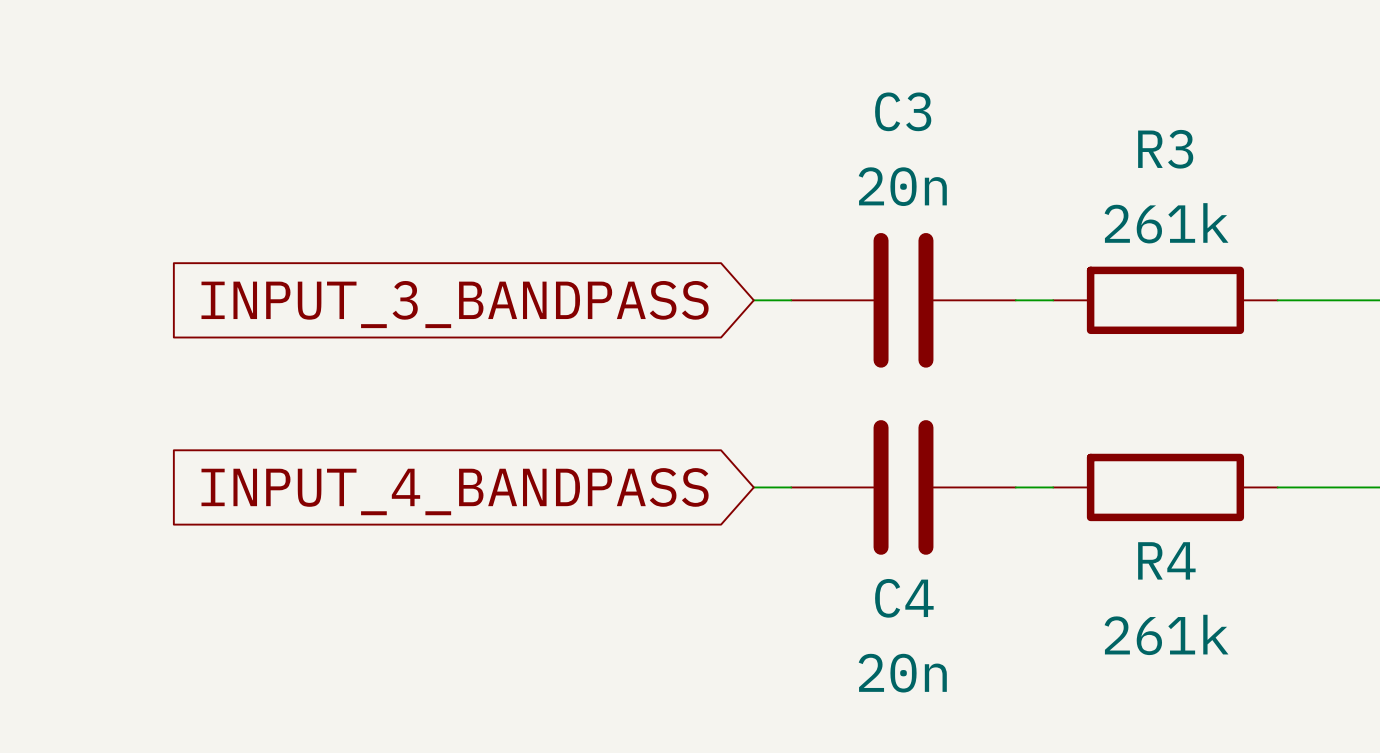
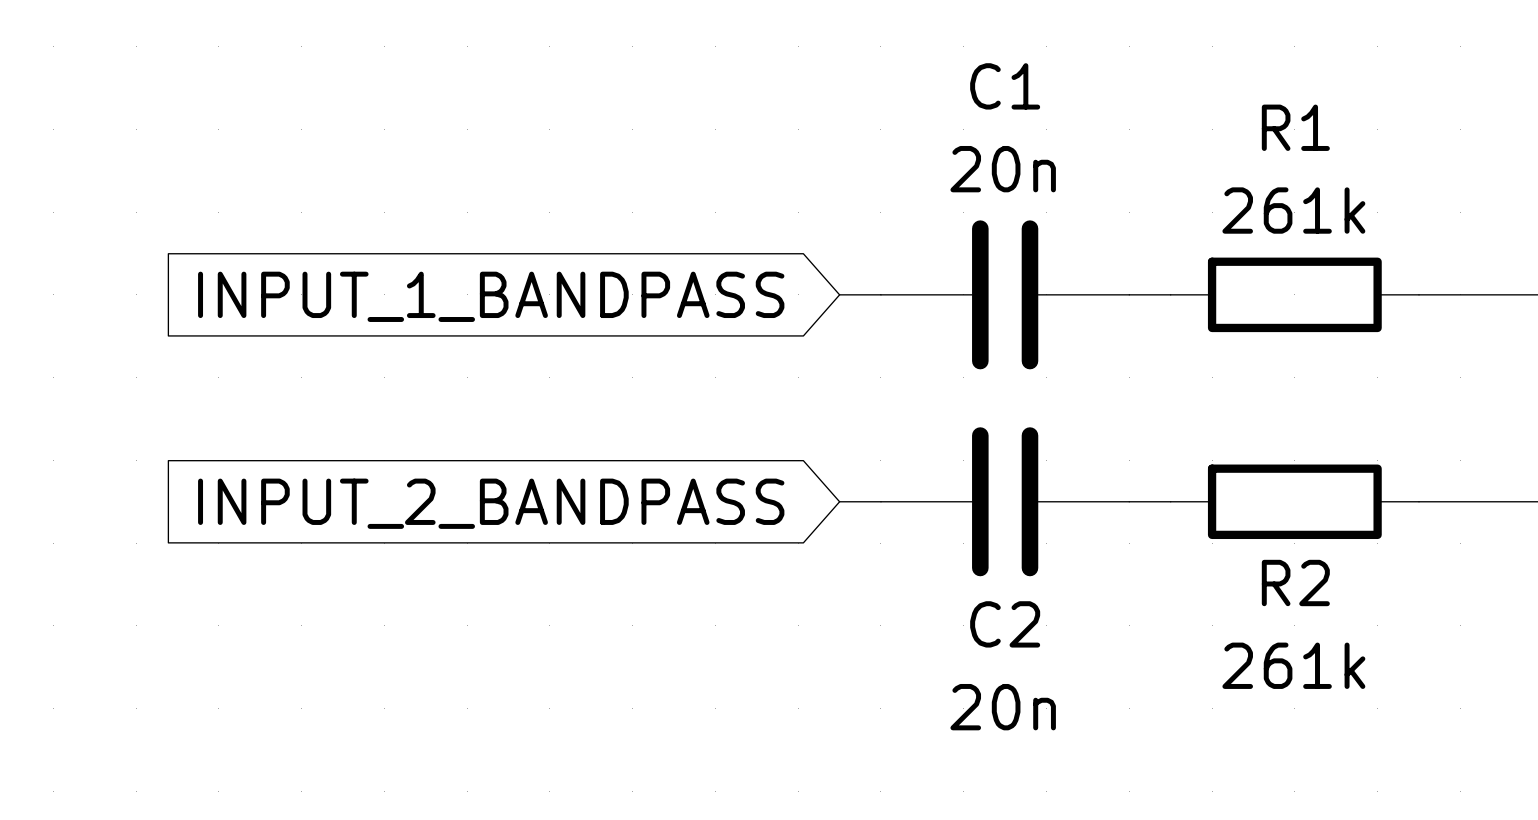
C3 name: C3 (903, 111) -> C1 (1005, 86)
R3 name: R3 (1165, 149) -> R1 (1295, 127)
global label: INPUT_3_BANDPASS (455, 304) -> INPUT_1_BANDPASS (491, 296)
global label: INPUT_4_BANDPASS (455, 491) -> INPUT_2_BANDPASS (491, 503)
R4 name: R4 (1166, 560) -> R2 (1295, 583)
C4 name: C4 (904, 598) -> C2 (1005, 624)

